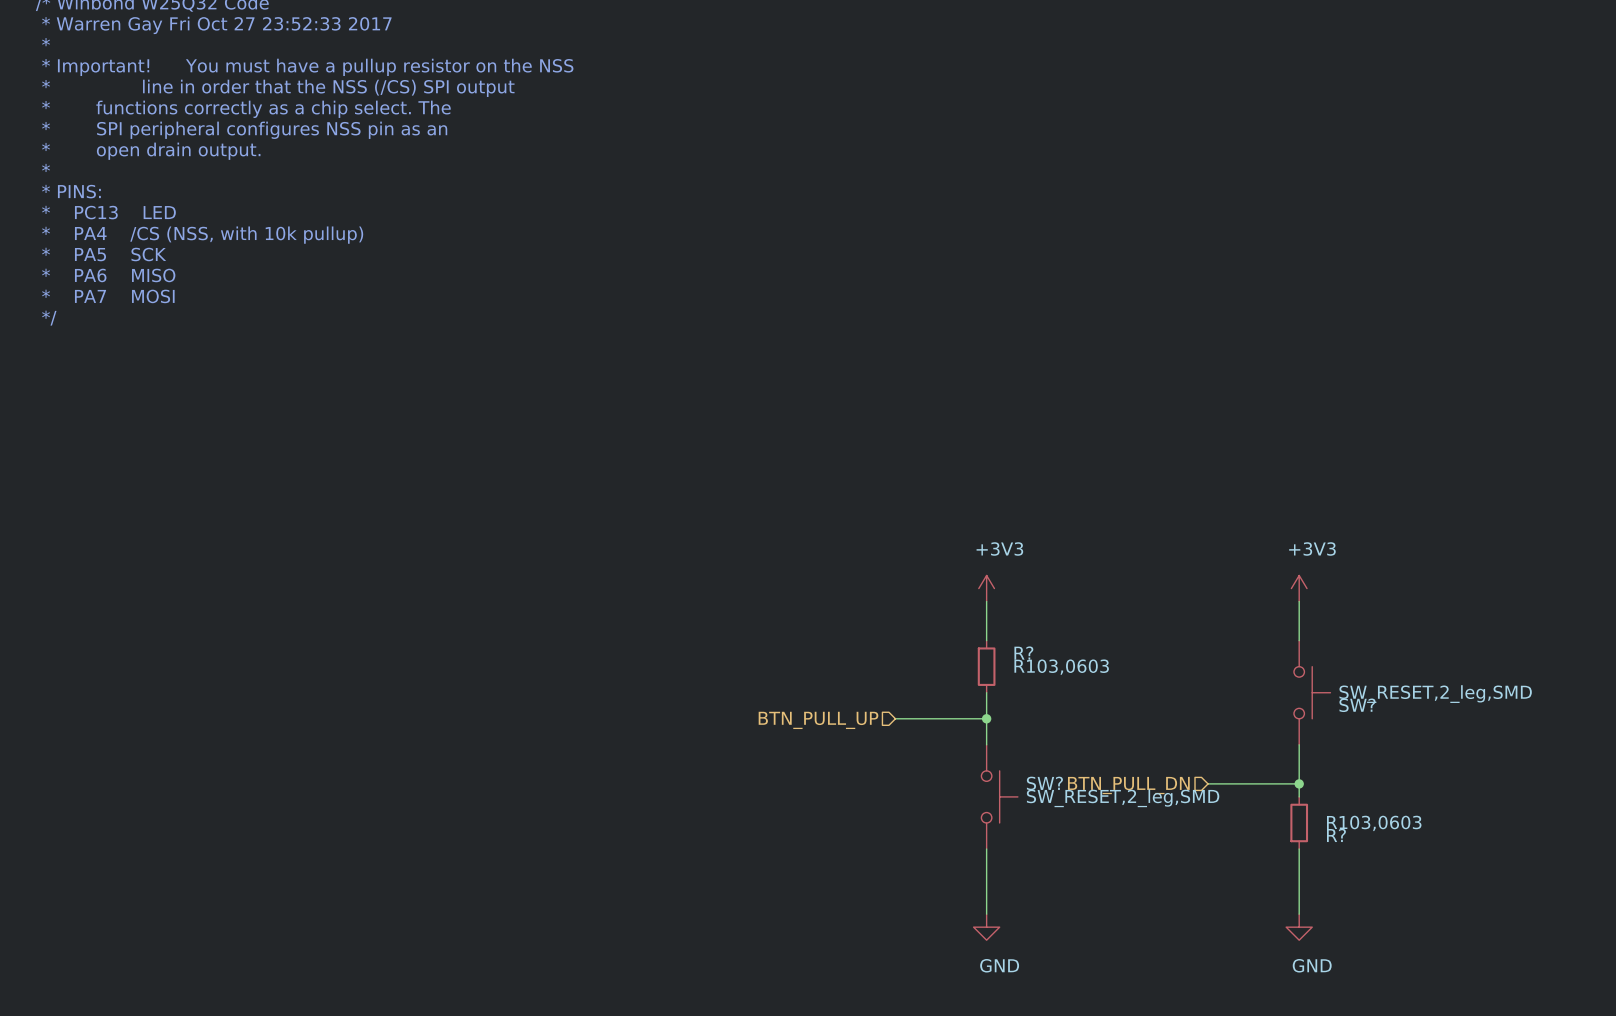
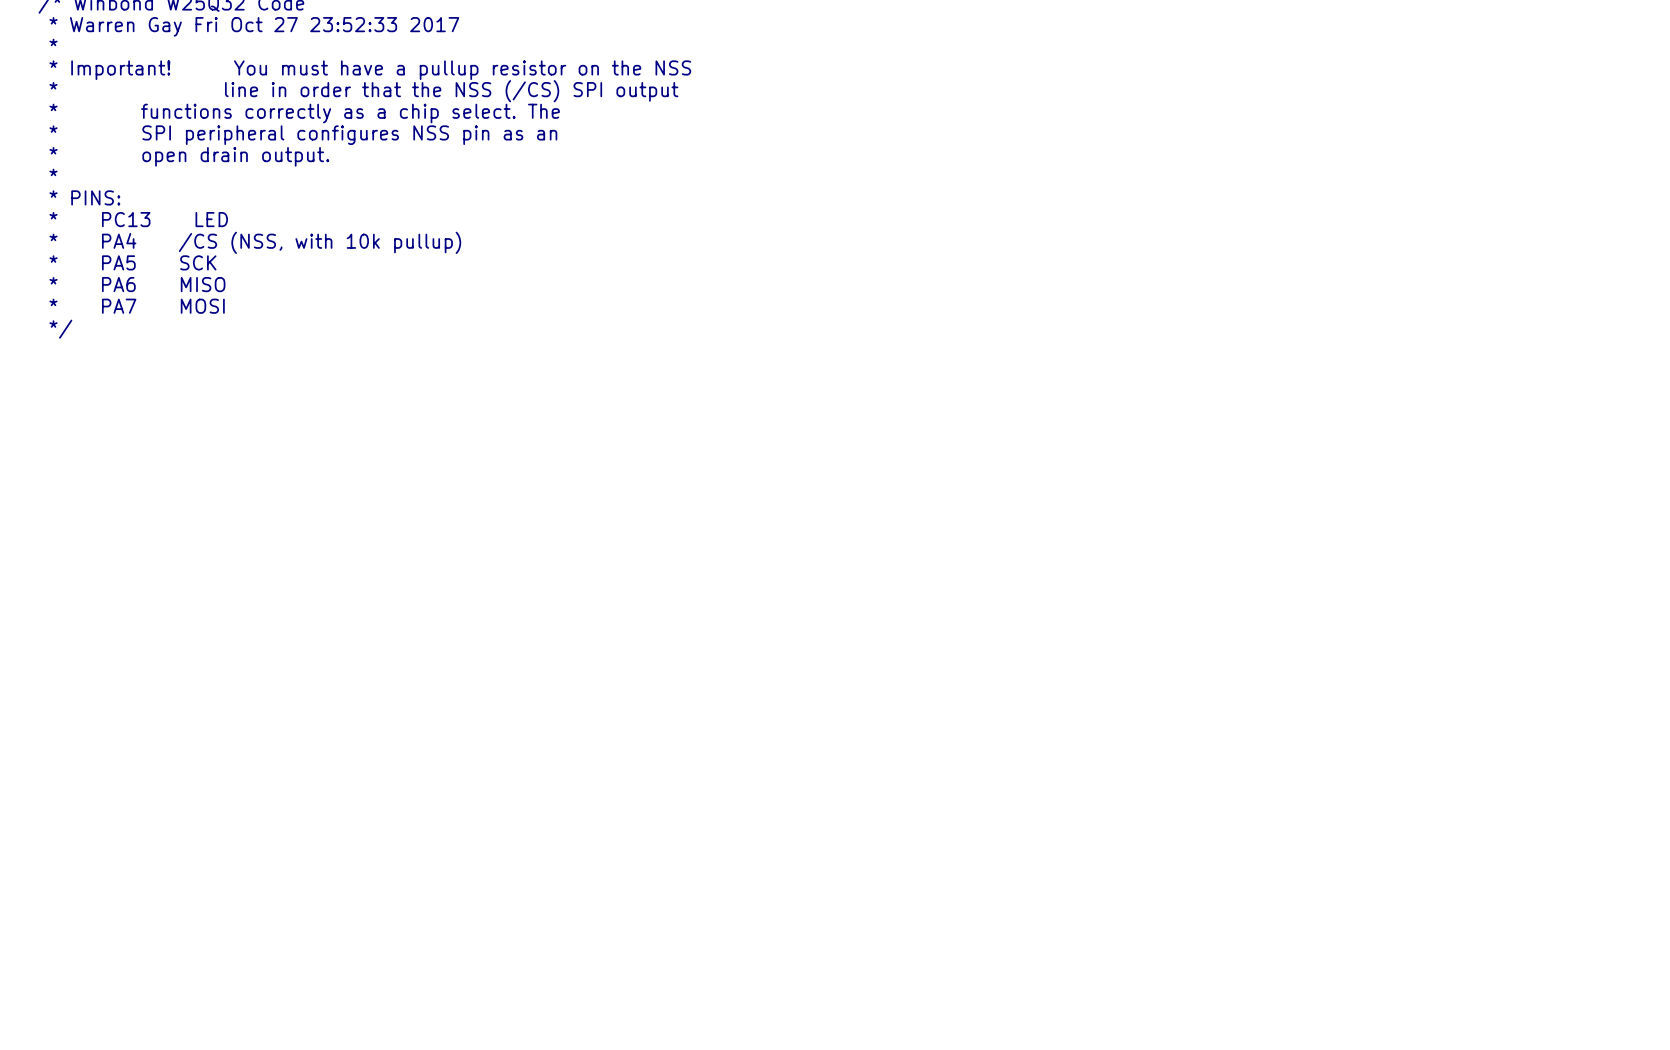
power symbol: +3V3 (986, 588) -> none
power symbol: +3V3 (1299, 588) -> none
wire: (986, 601) (986, 640) -> none
wire: (1299, 601) (1299, 640) -> none
R?: R103,0603 (986, 666) -> none
wire: (986, 692) (986, 744) -> none
SW?: SW_RESET,2_leg,SMD (1312, 692) -> none
wire: (895, 718) (986, 718) -> none
junction: (986, 718) -> none
hierarchical label: BTN_PULL_UP (818, 720) -> none
wire: (1299, 744) (1299, 796) -> none
wire: (1208, 783) (1299, 783) -> none
junction: (1299, 783) -> none
hierarchical label: BTN_PULL_DN (1128, 785) -> none
SW?: SW_RESET,2_leg,SMD (999, 796) -> none
R?: R103,0603 (1299, 822) -> none
wire: (986, 849) (986, 914) -> none
wire: (1299, 849) (1299, 914) -> none
power symbol: GND (986, 927) -> none
power symbol: GND (1299, 927) -> none

